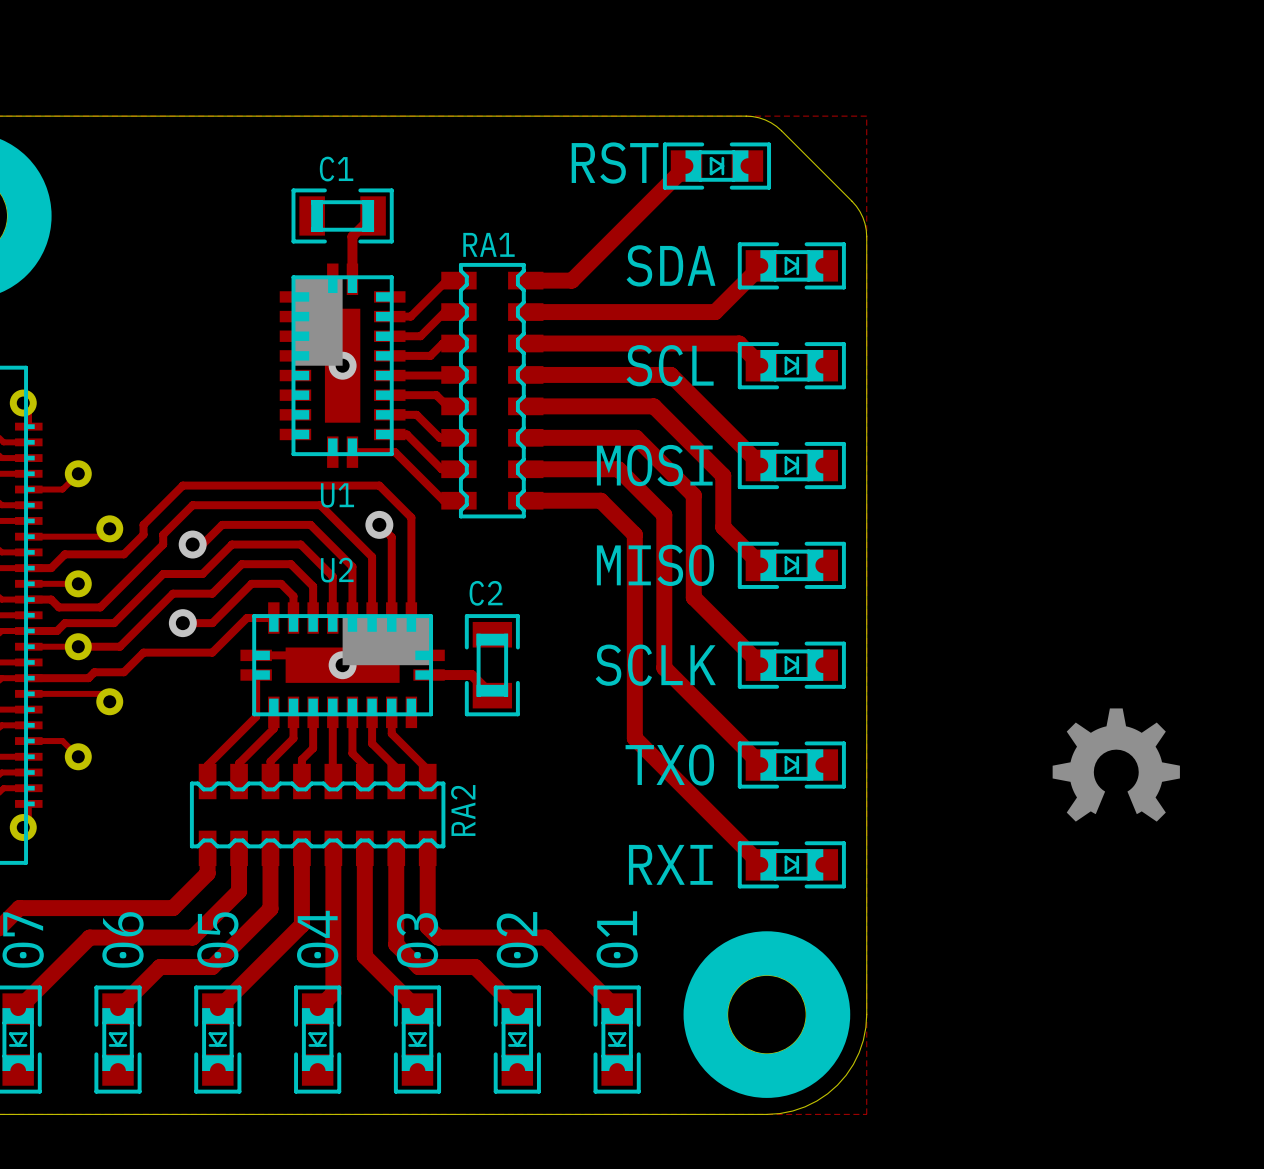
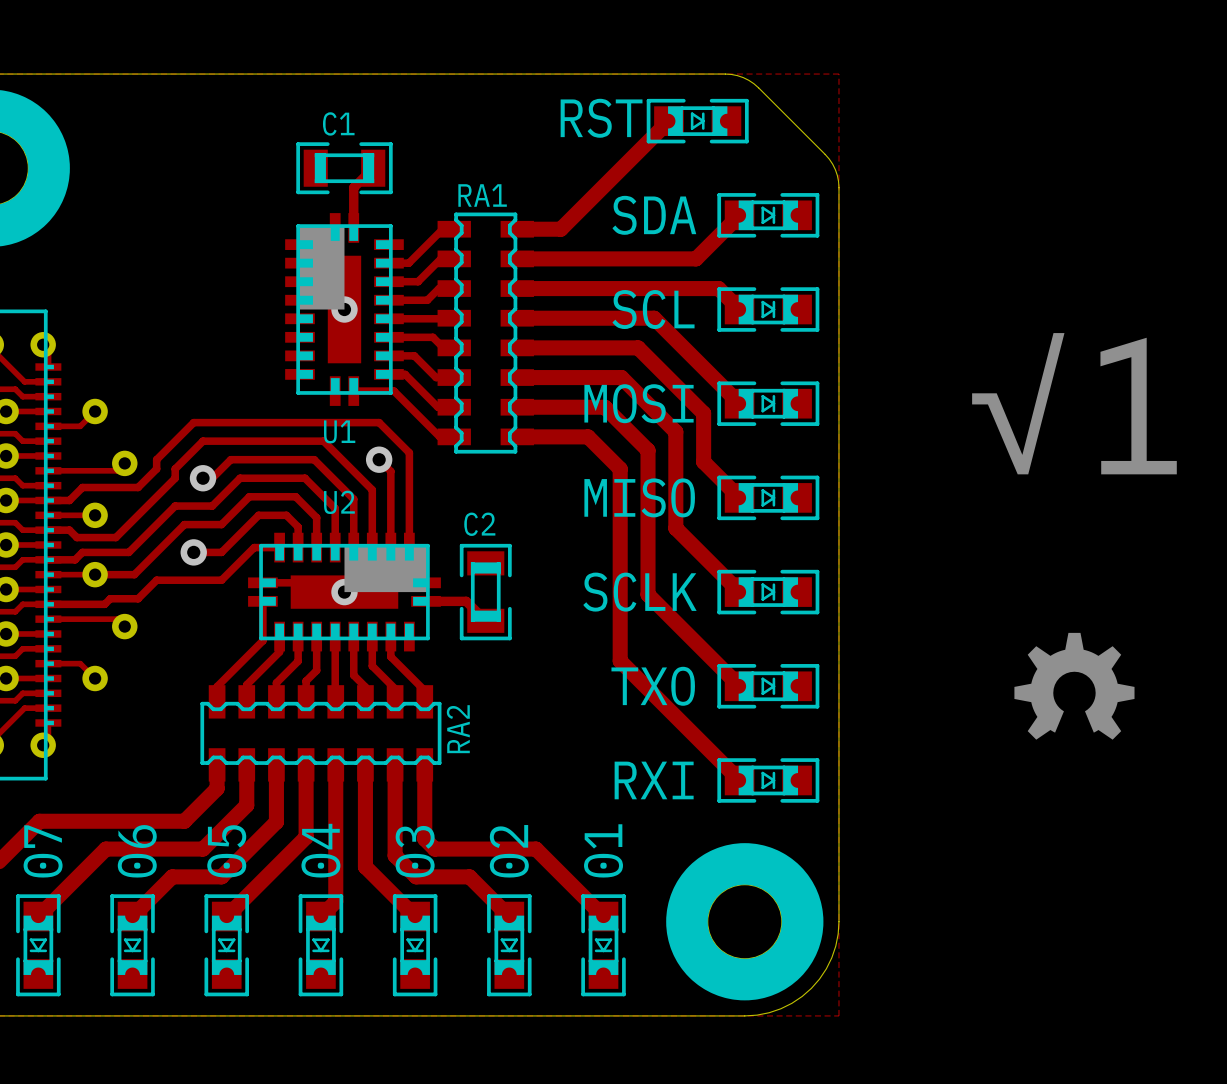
drawing: none -> [972, 333, 1177, 475]

